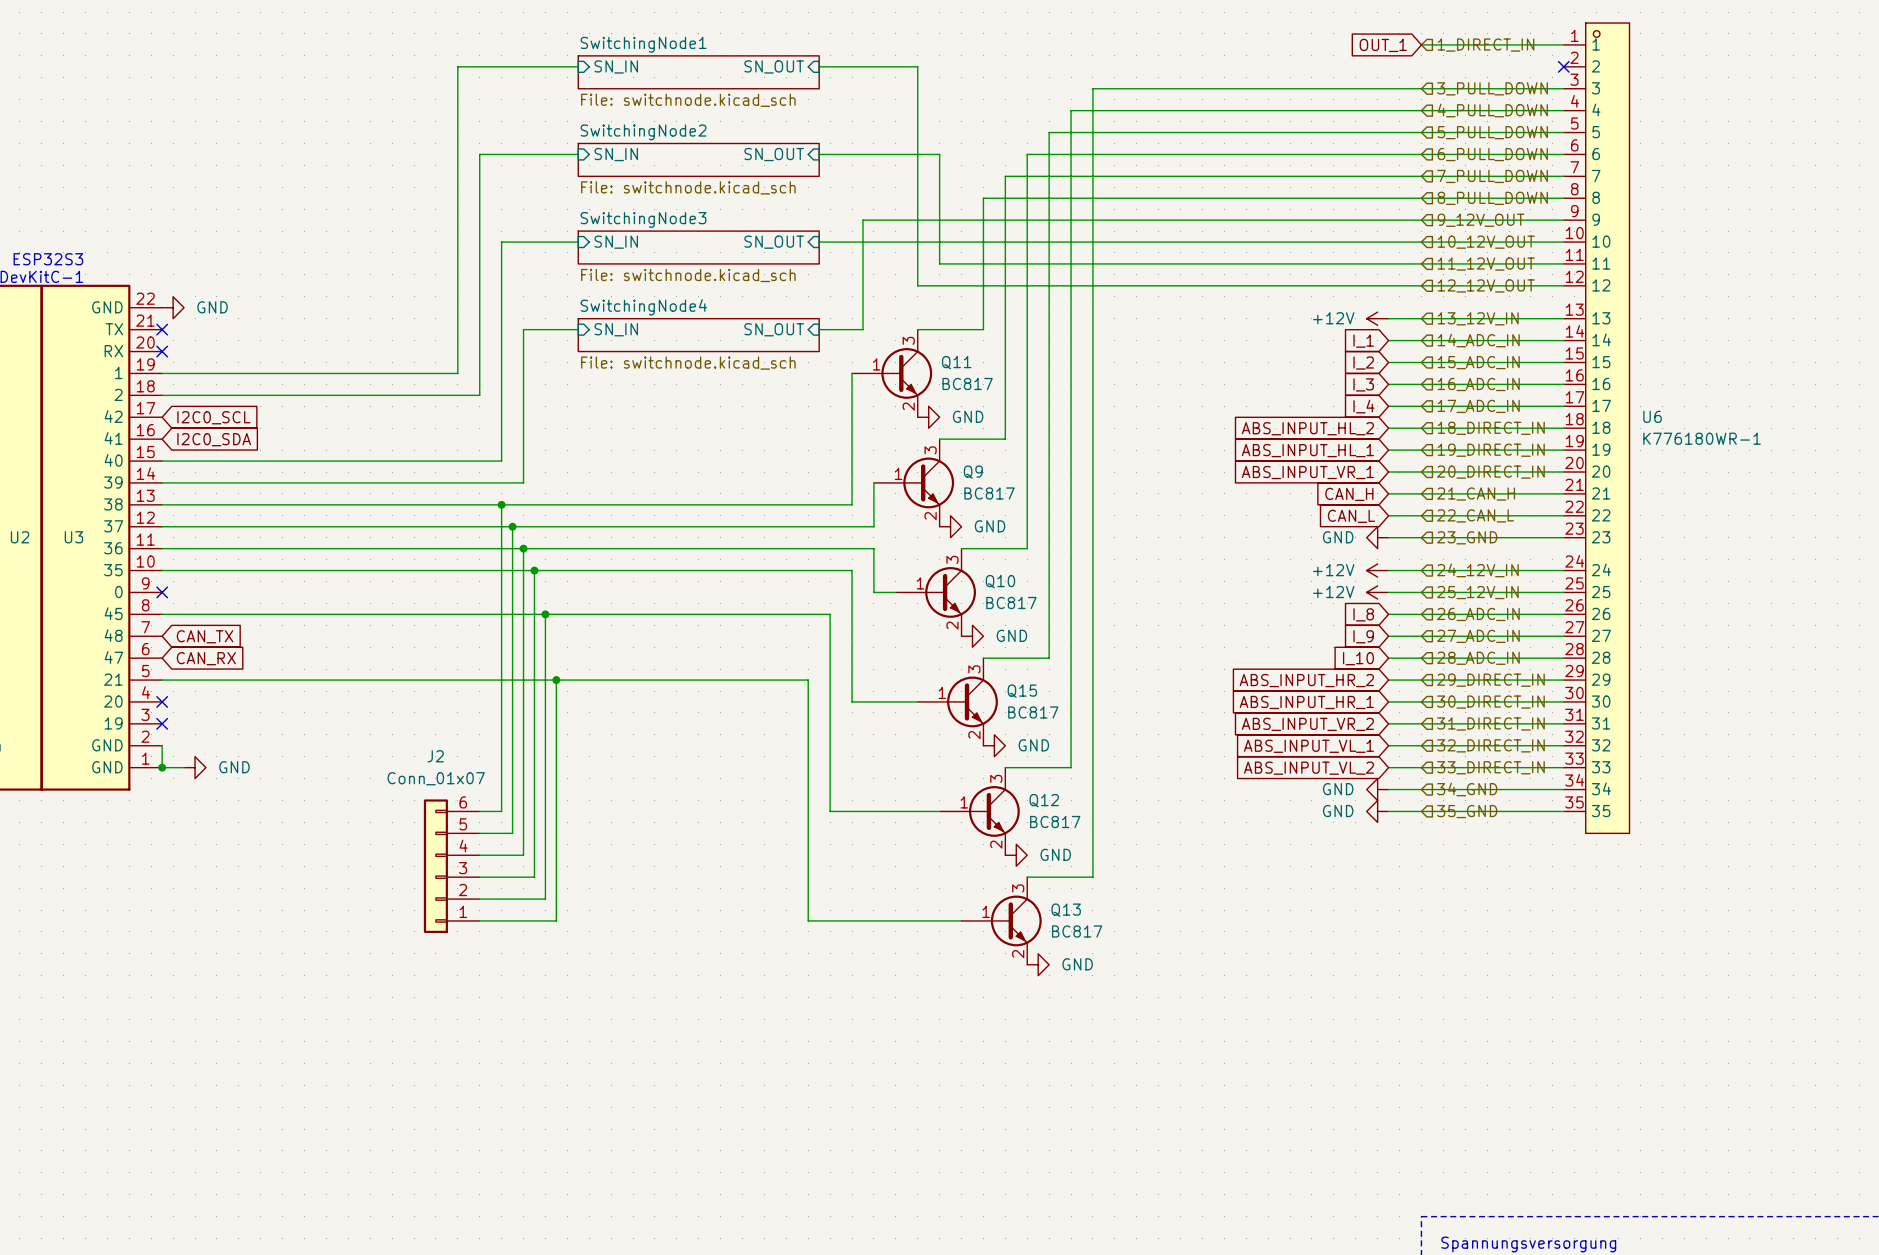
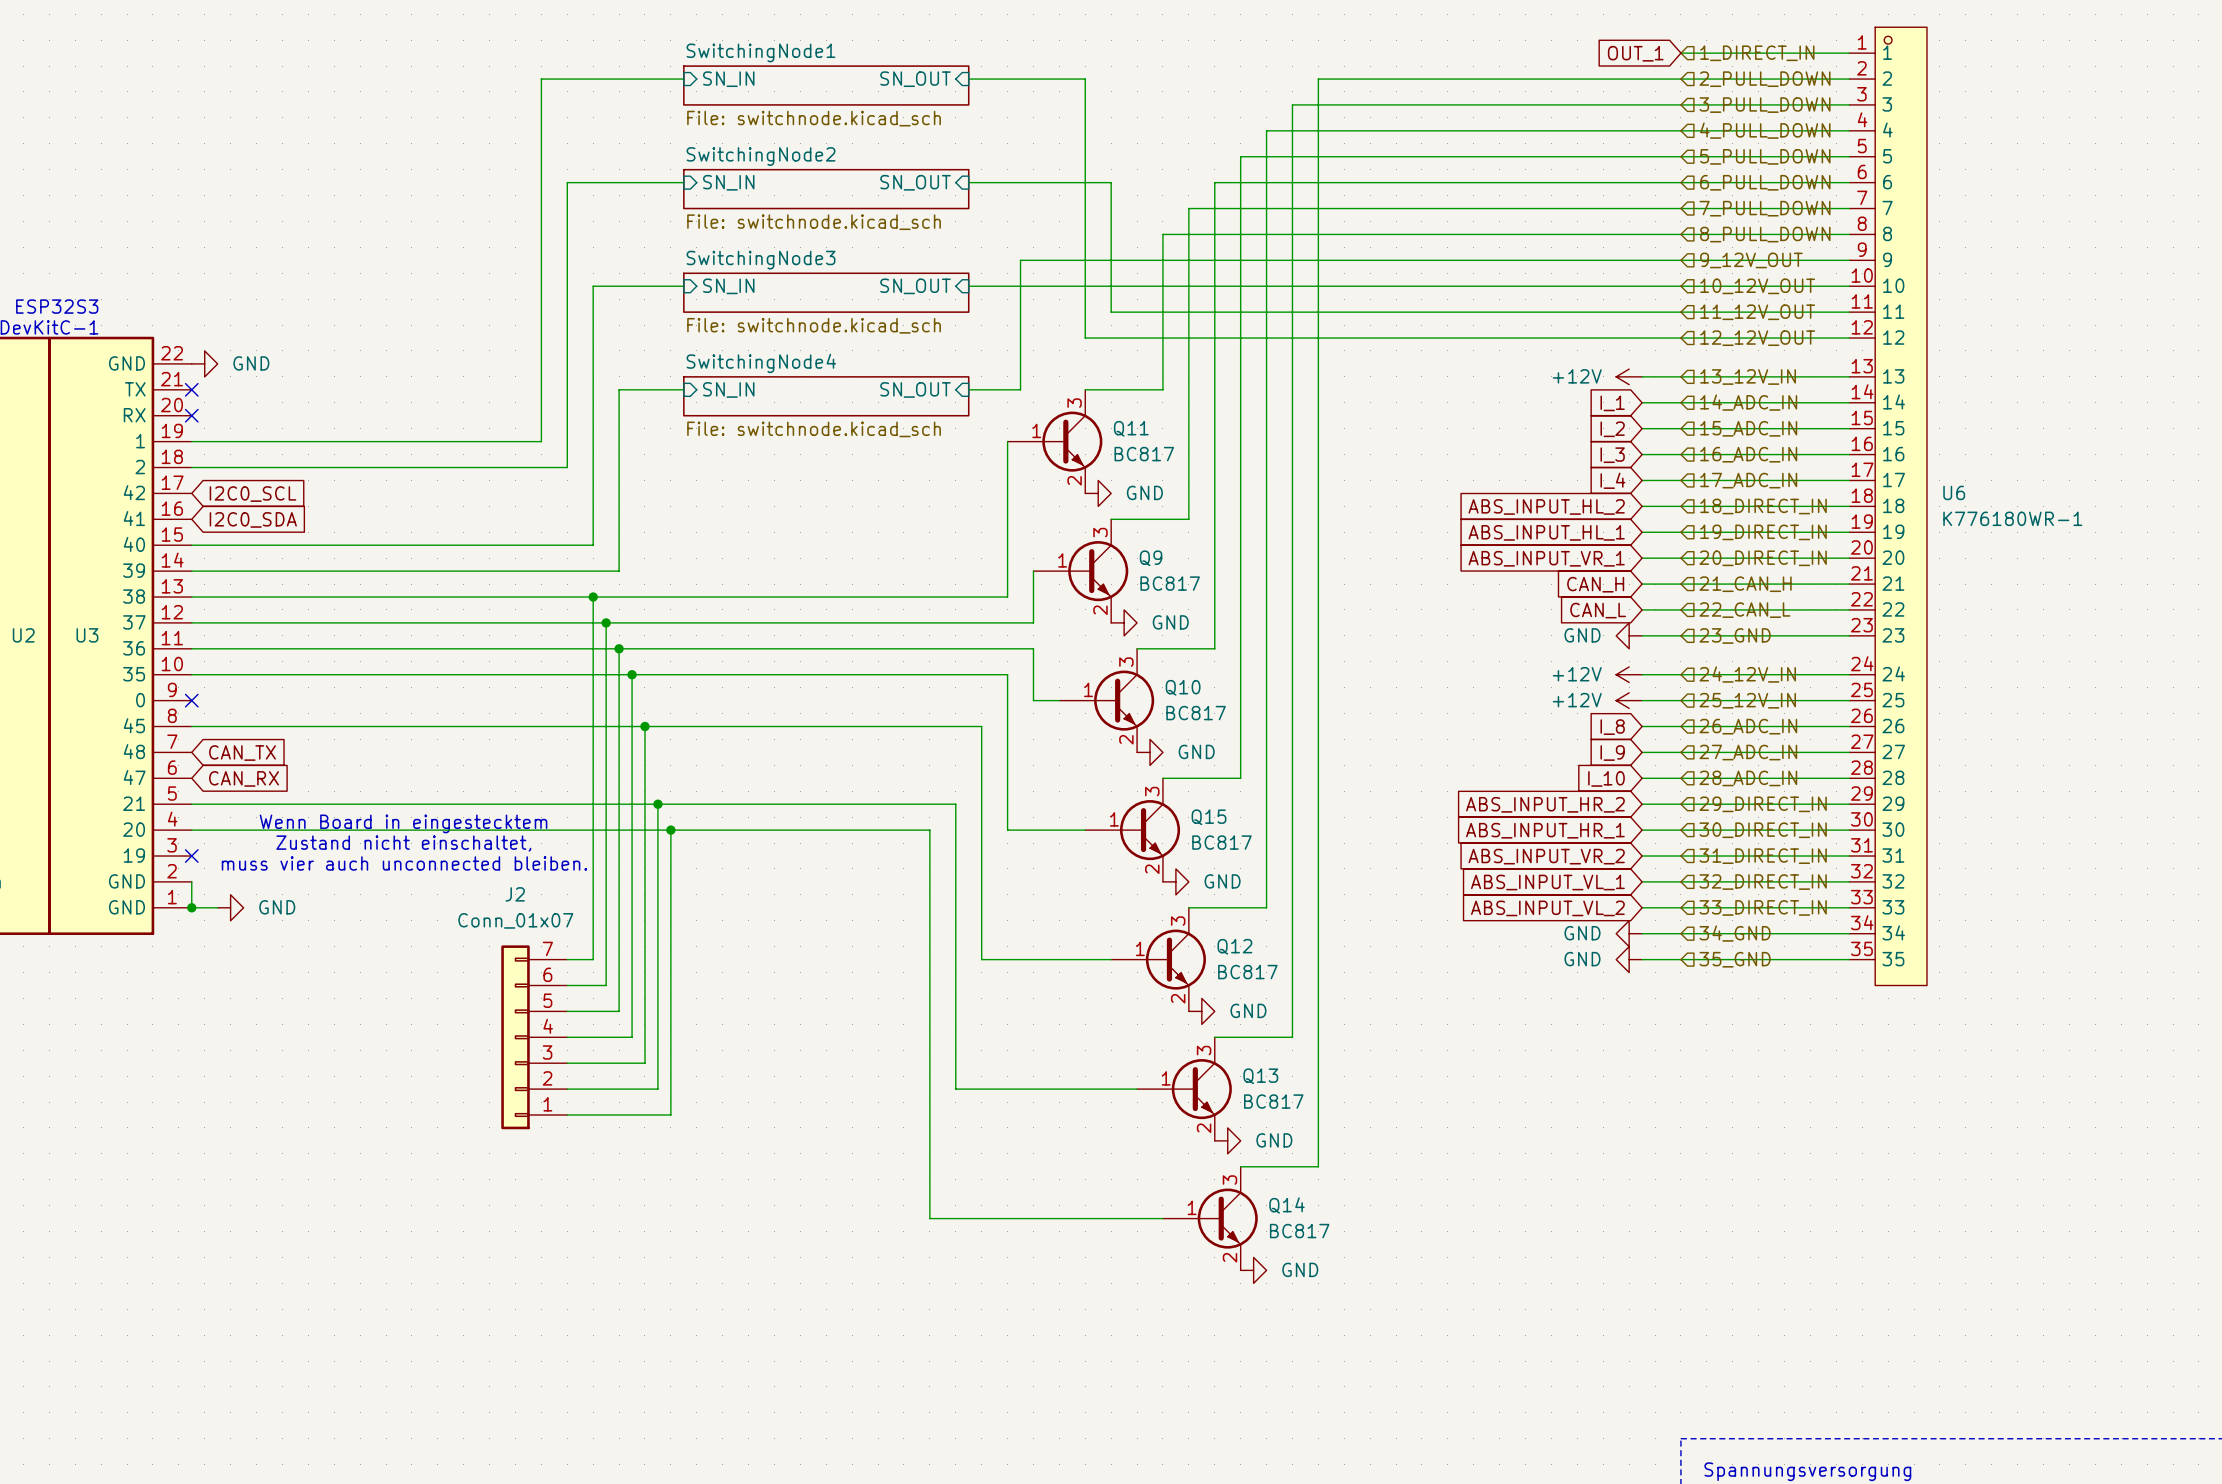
hierarchical label: none -> 2_PULL_DOWN (1765, 79)
wire: none -> (1849, 79) (1318, 79) (1318, 1166) (1240, 1166)
no-connect mark: (1563, 66) -> none
text: none -> Wenn Board in eingestecktem (403, 823)
wire: none -> (191, 830) (929, 830) (929, 1218) (1162, 1218)
no-connect mark: (162, 701) -> none
wire: none -> (670, 830) (670, 1114) (567, 1114)
junction: none -> (670, 830)
text: none -> Zustand nicht einschaltet, (403, 843)
text: none -> muss vier auch unconnected bleiben. (404, 863)
J2 symbol: [423, 799, 480, 934] -> [501, 945, 568, 1130]
Q14: none -> BC817 (1210, 1218)
power symbol: none -> GND (1253, 1270)

